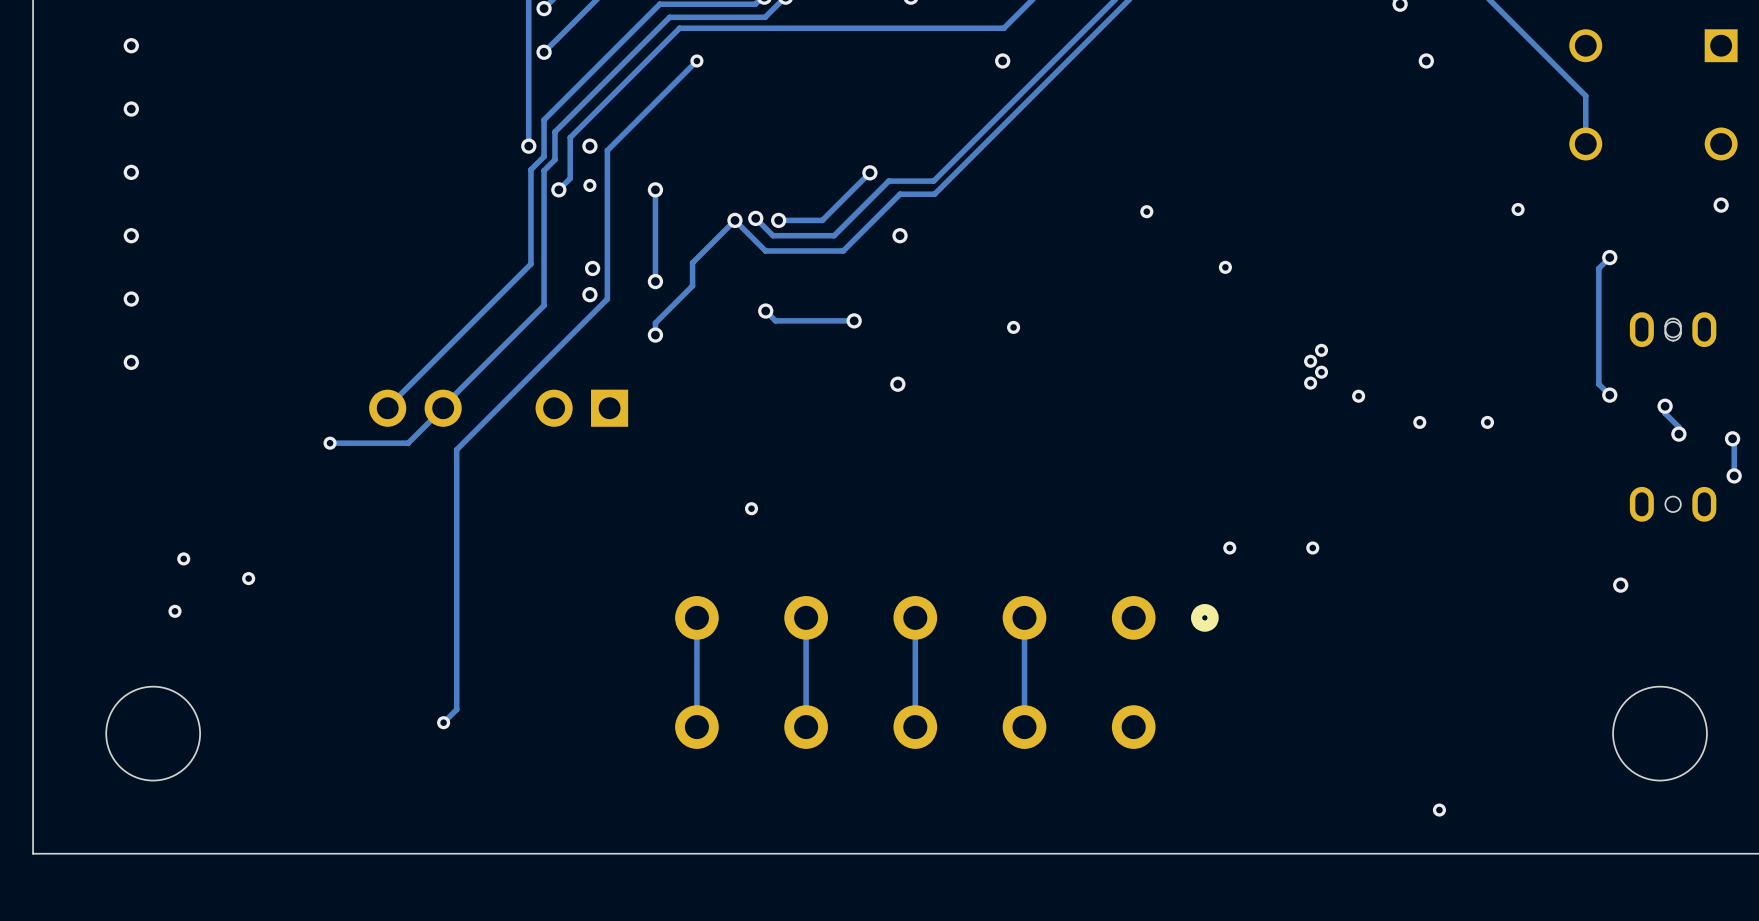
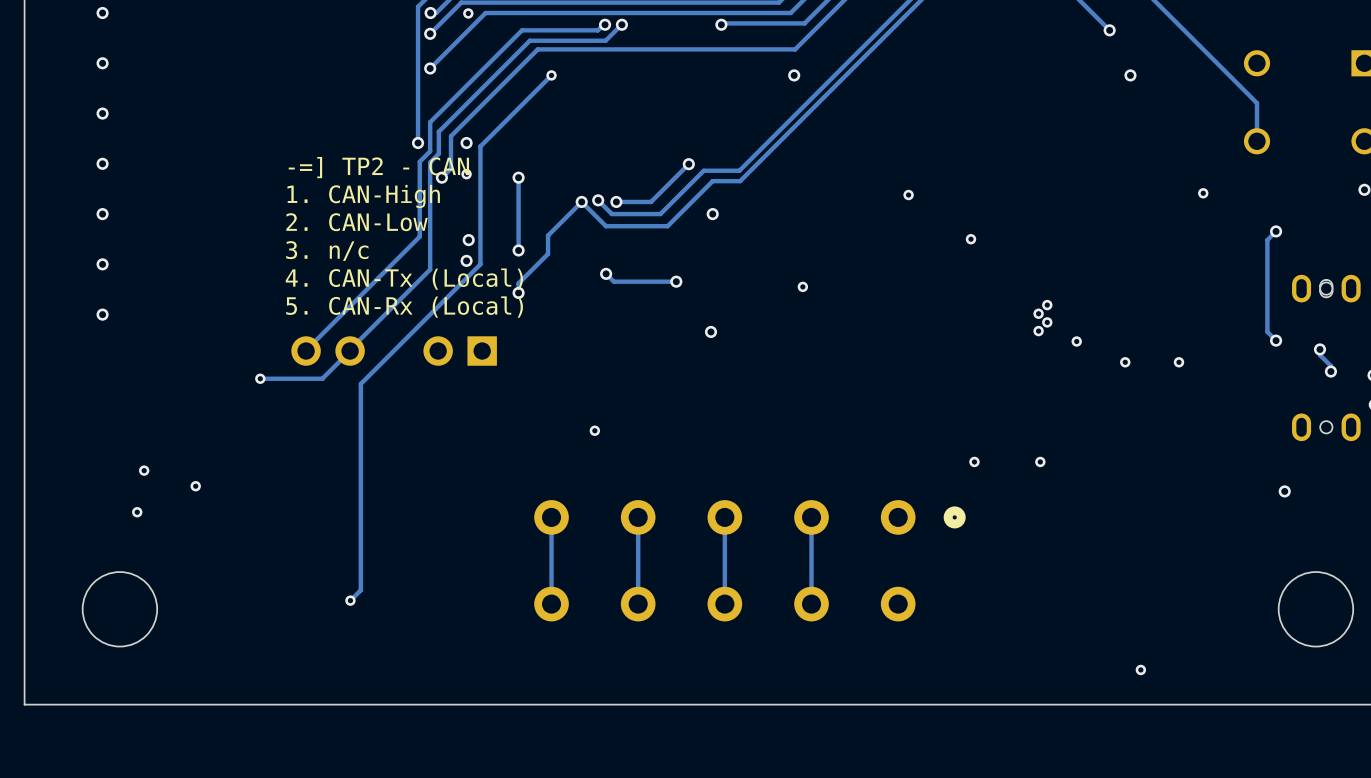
text: none -> -=] TP2 - CAN (378, 167)
text: none -> 1. CAN-High (363, 196)
text: none -> 2. CAN-Low (357, 222)
text: none -> 3. n/c (327, 251)
text: none -> 4. CAN-Tx (Local) (404, 279)
text: none -> 5. CAN-Rx (Local) (404, 307)

